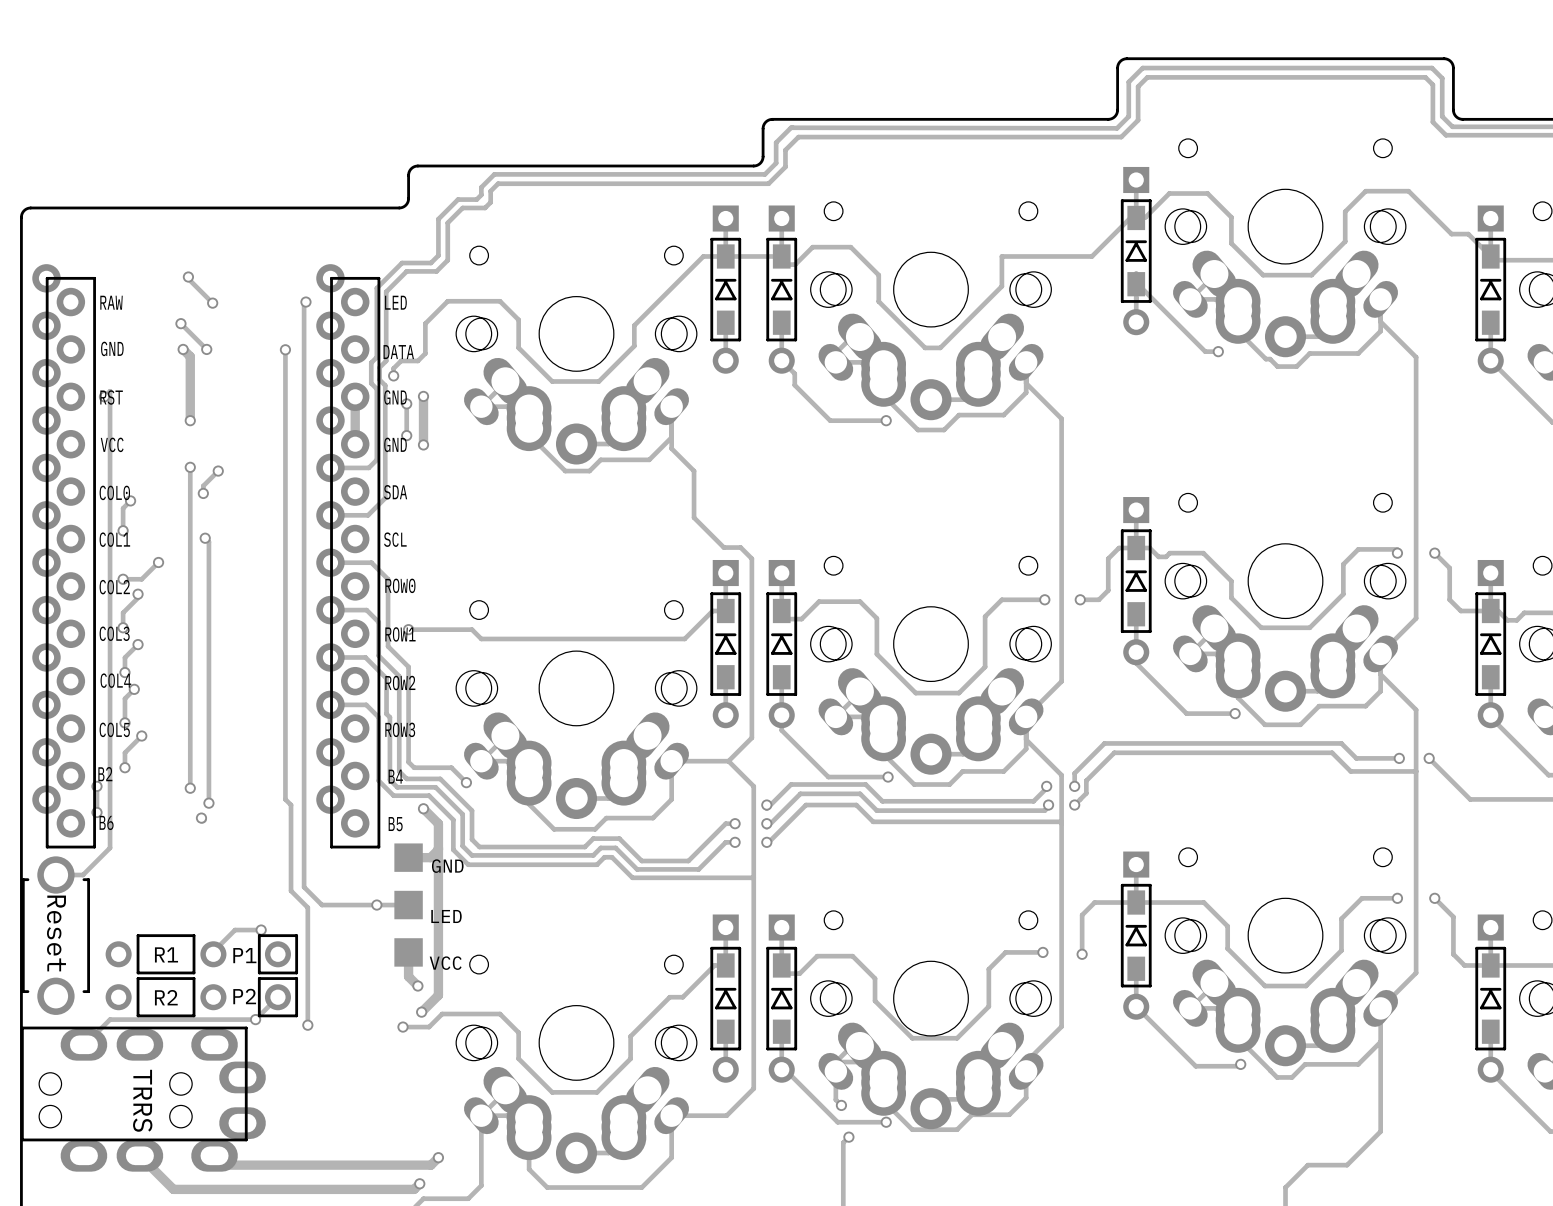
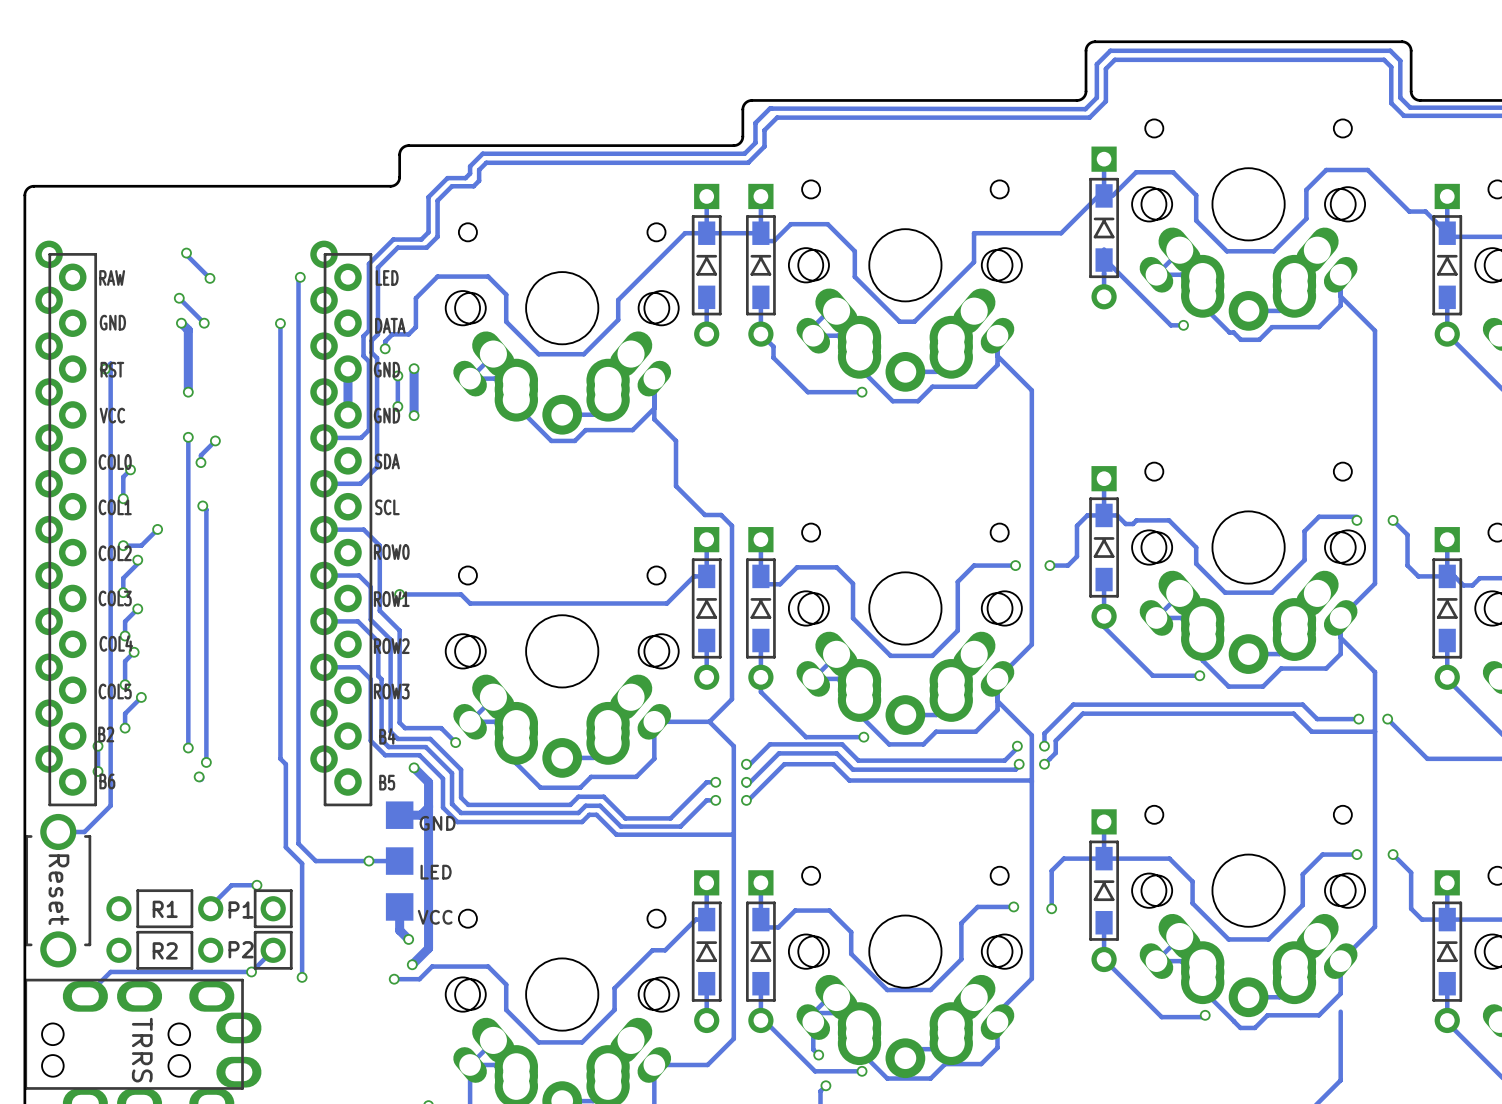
track: (1380, 1041) (1380, 1060) -> none

